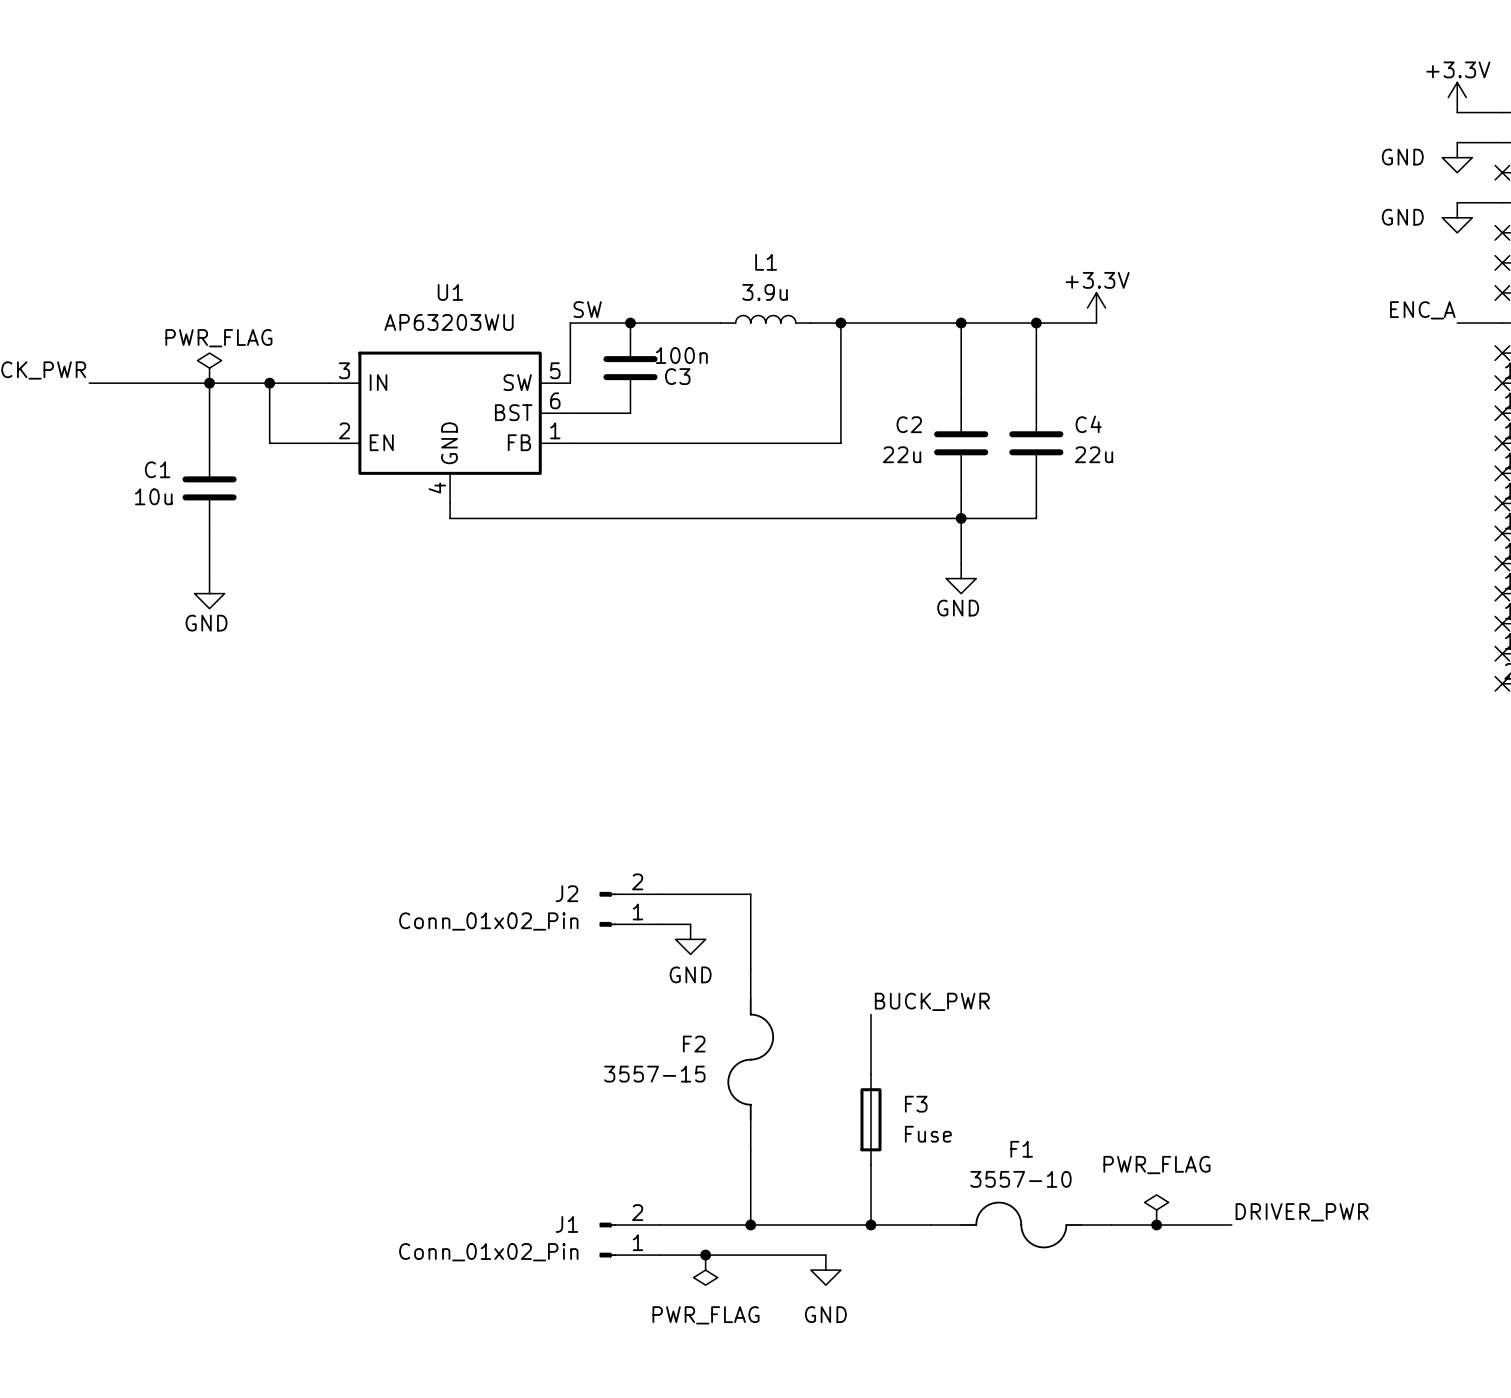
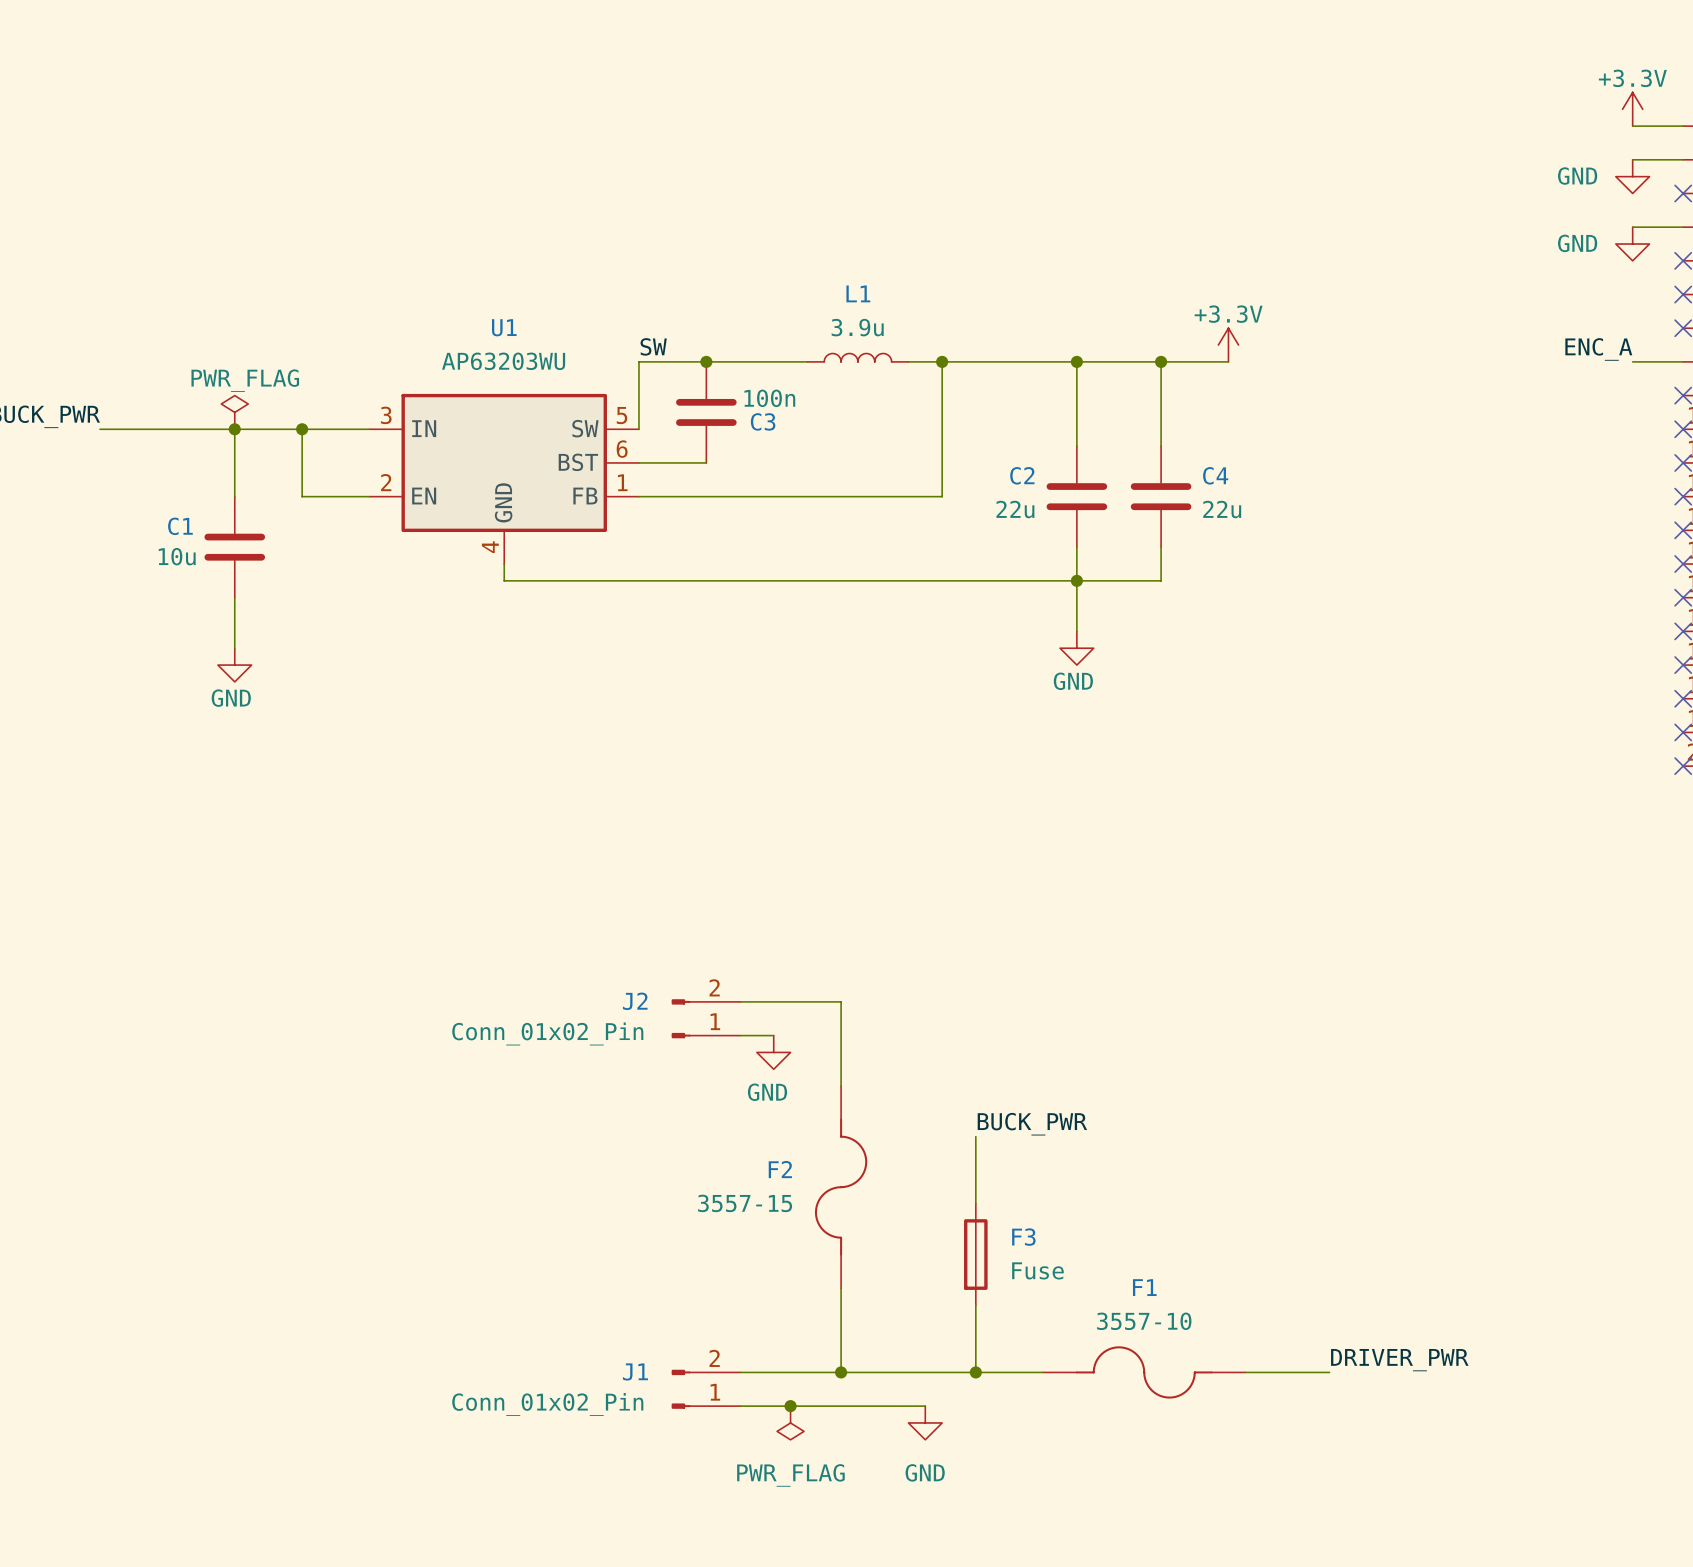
power symbol: PWR_FLAG (1156, 1209) -> none
label position: DRIVER_PWR (1302, 1212) -> DRIVER_PWR (1399, 1360)
junction: (1156, 1225) -> none
wire: (1186, 1225) (1231, 1225) -> none

